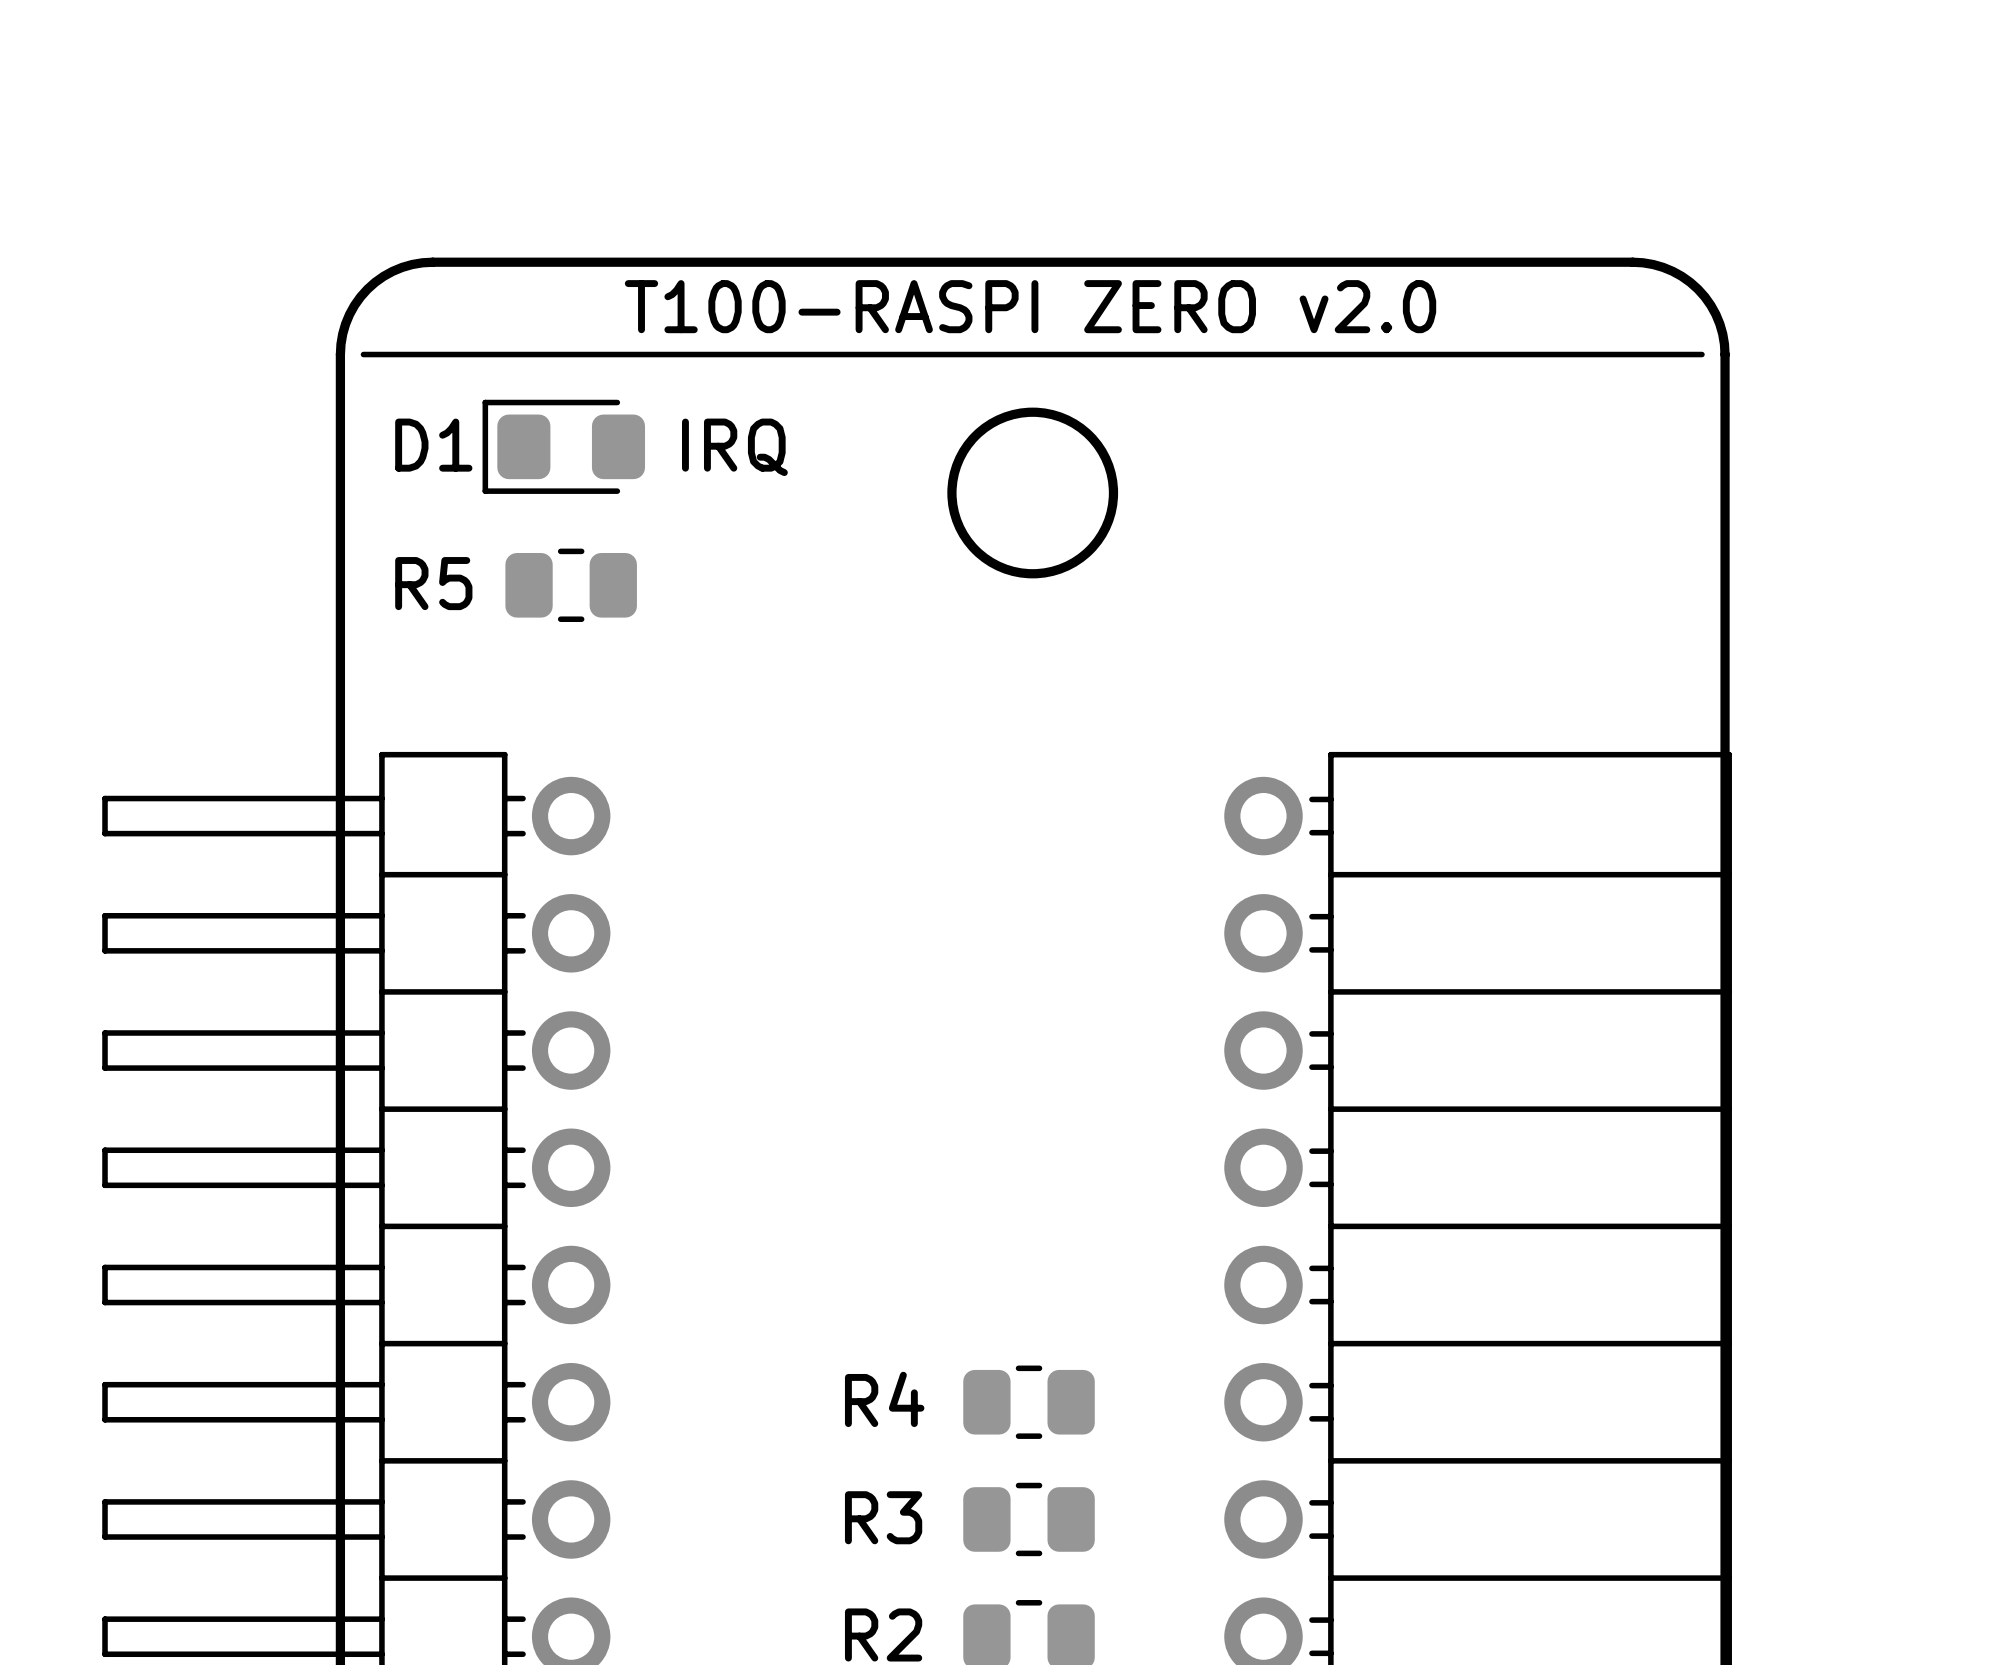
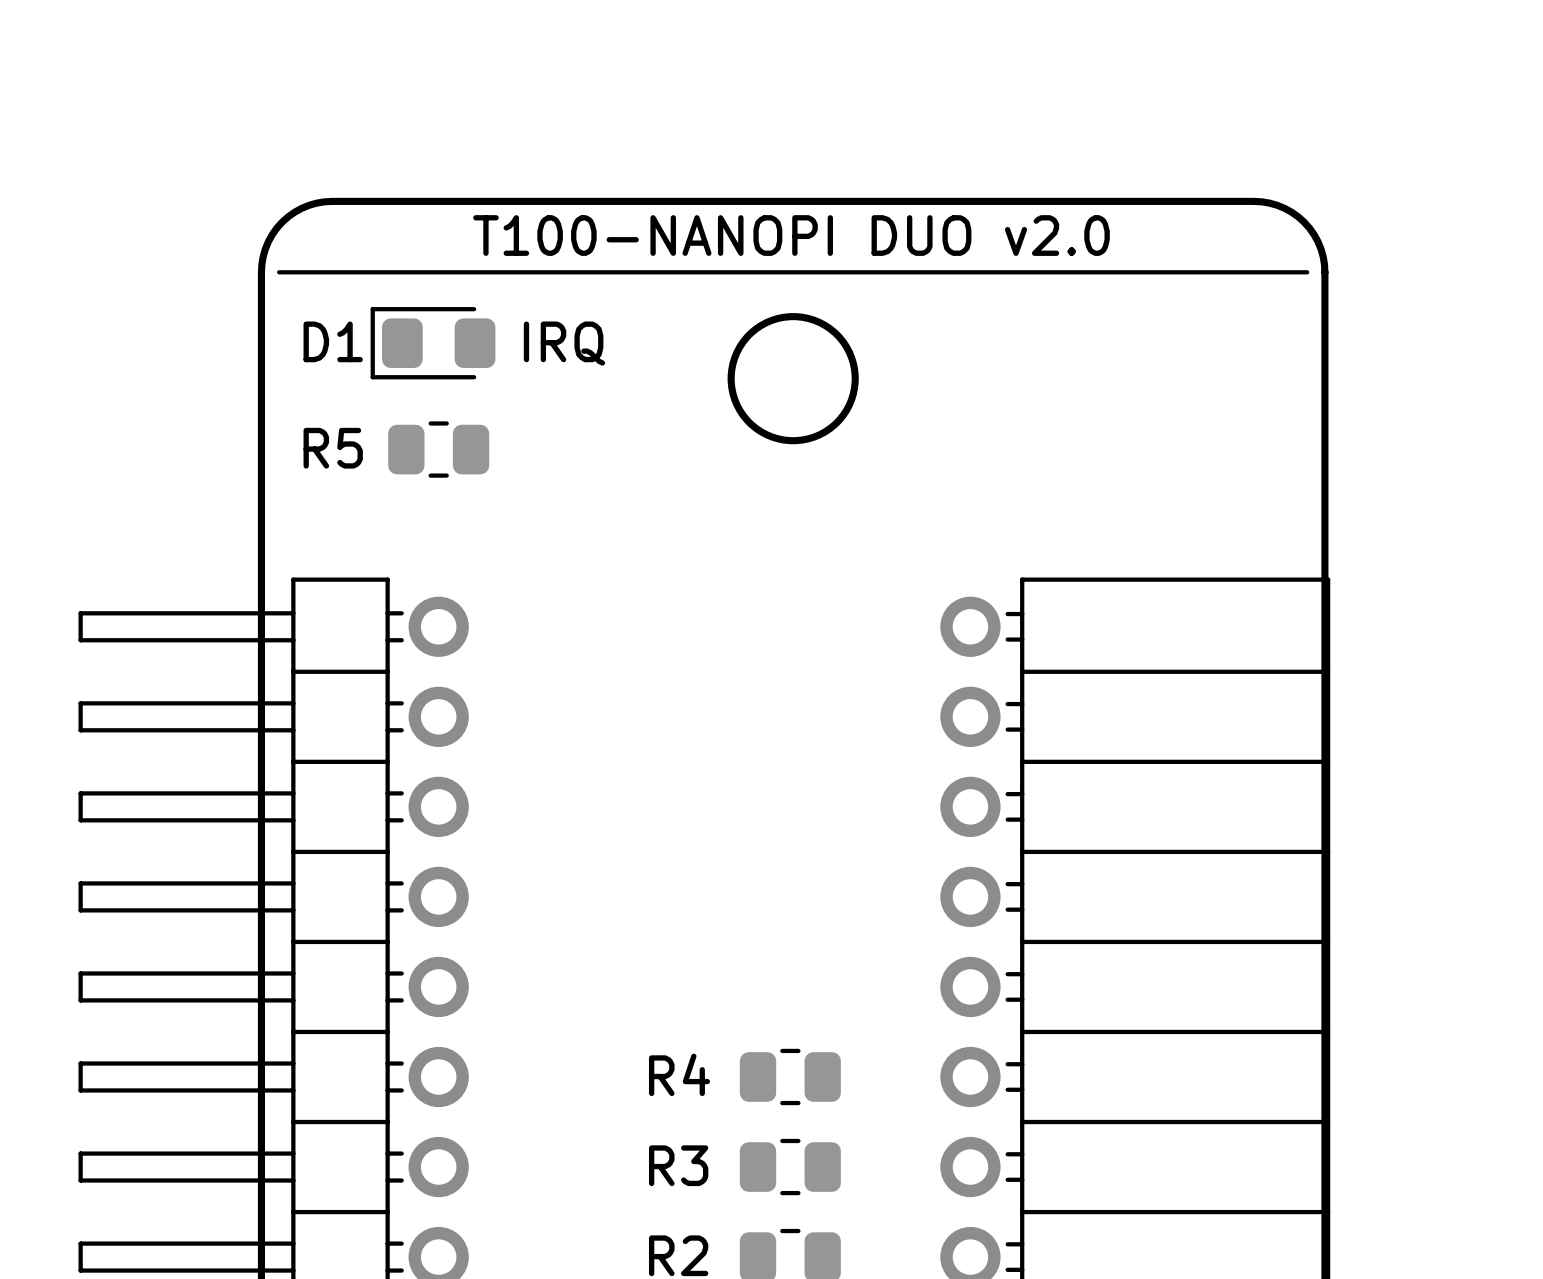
text: T100-RASPI ZERO v2.0 (1030, 306) -> T100-NANOPI DUO v2.0 (791, 235)

